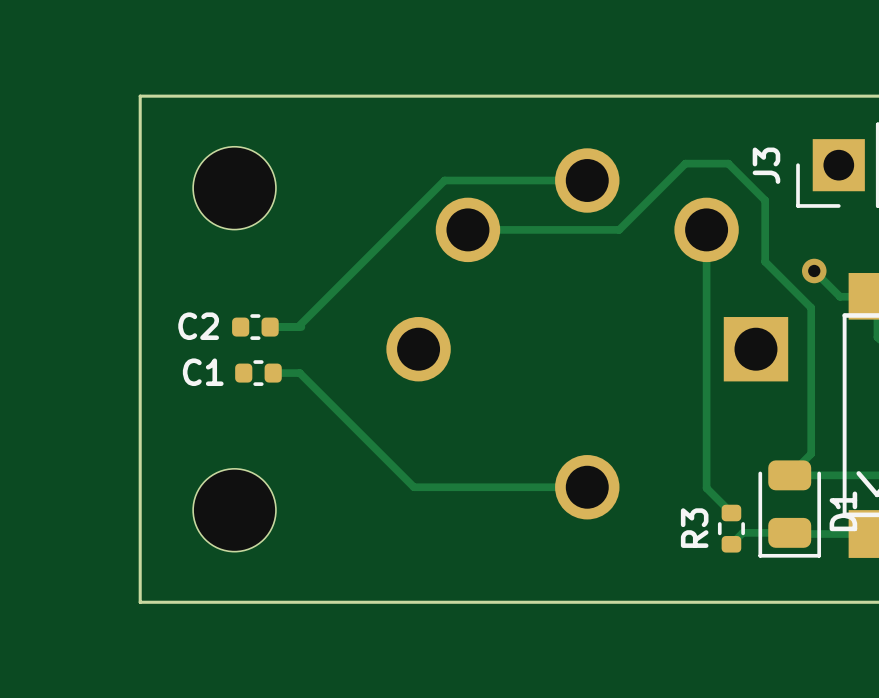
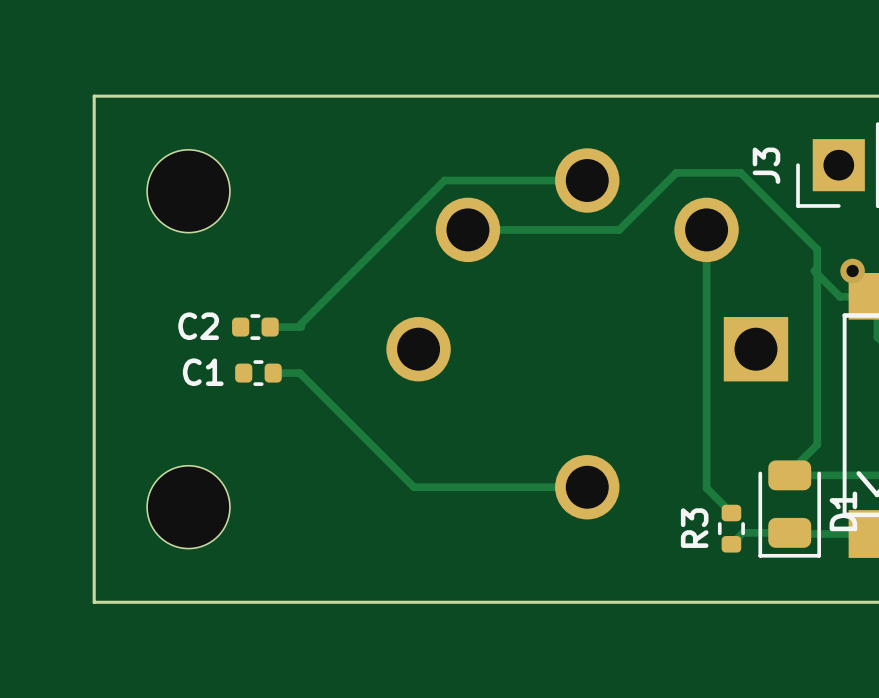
board edge: (140, 96) (140, 602) -> (140, 96) (94, 96) (94, 602) (140, 602)
track: (676, 172) (685, 163) (728, 163) (765, 200) (765, 261) (811, 307) (811, 453) (789, 475) (801, 475) -> (676, 172) (740, 172) (817, 249) (817, 444) (786, 475)
part position: (234, 188) -> (188, 191)
via position: (814, 270) -> (852, 270)
part position: (234, 510) -> (188, 507)

